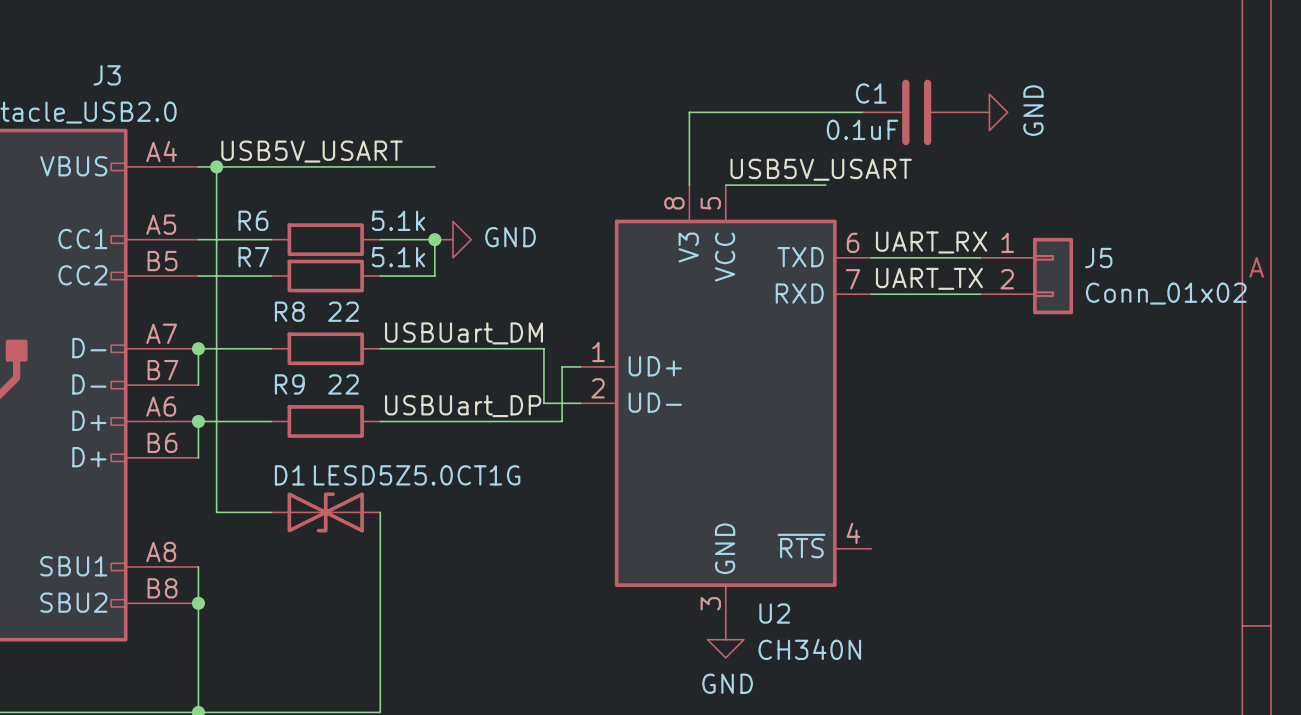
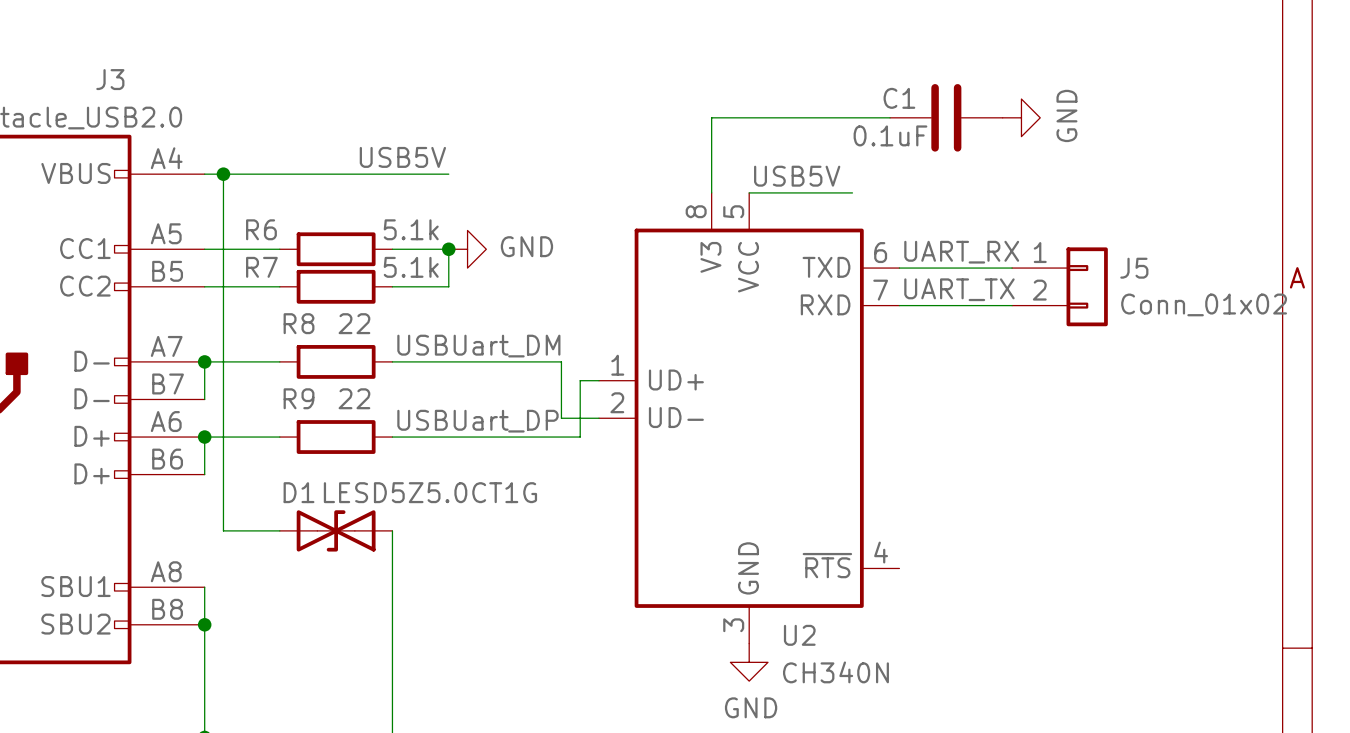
label: USB5V_USART (312, 151) -> USB5V (402, 157)
label: USB5V_USART (821, 169) -> USB5V (797, 176)

